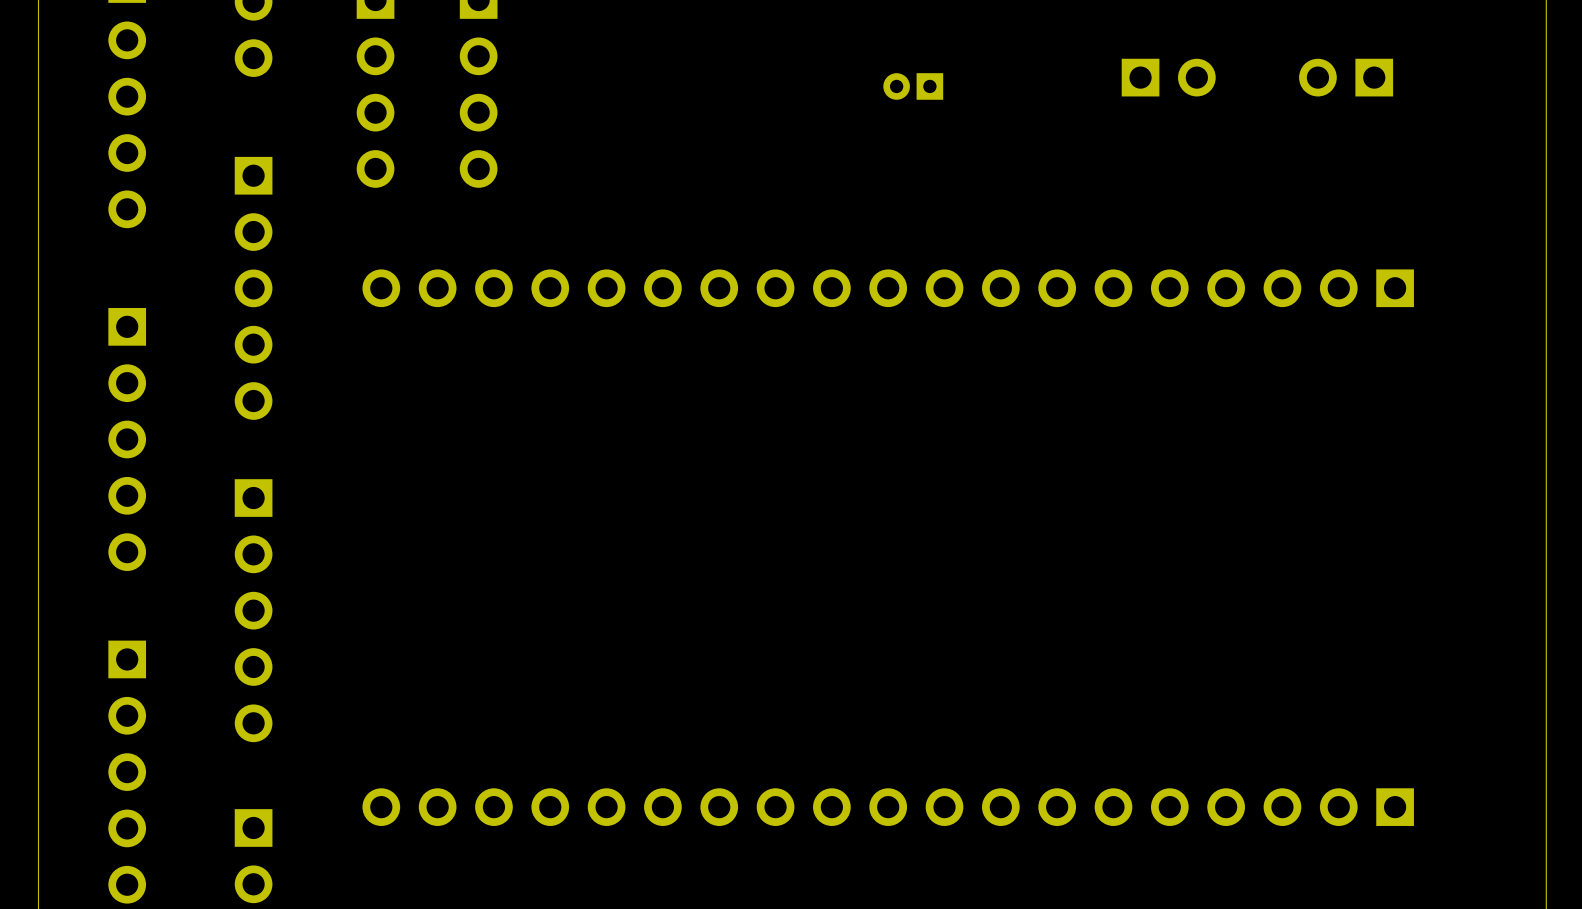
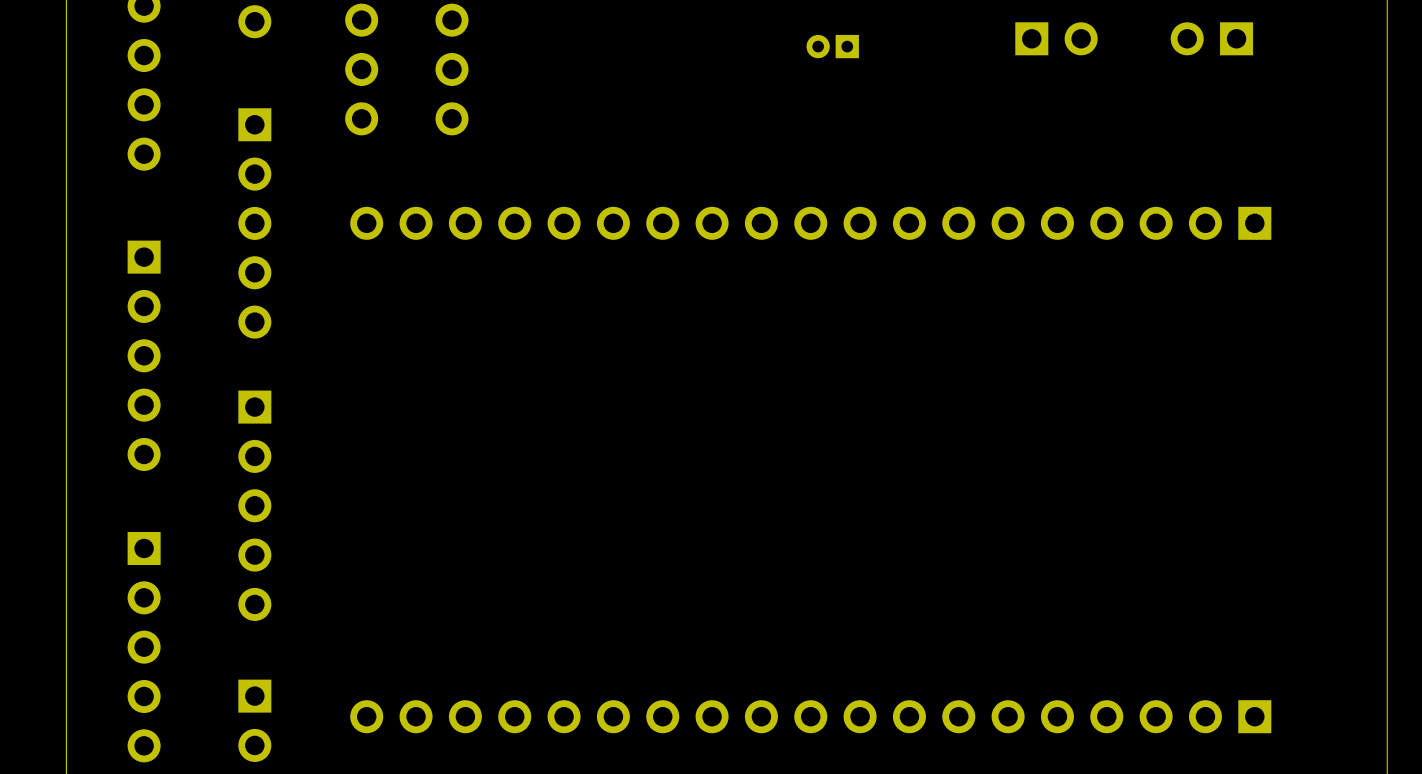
part position: (888, 807) -> (810, 716)

